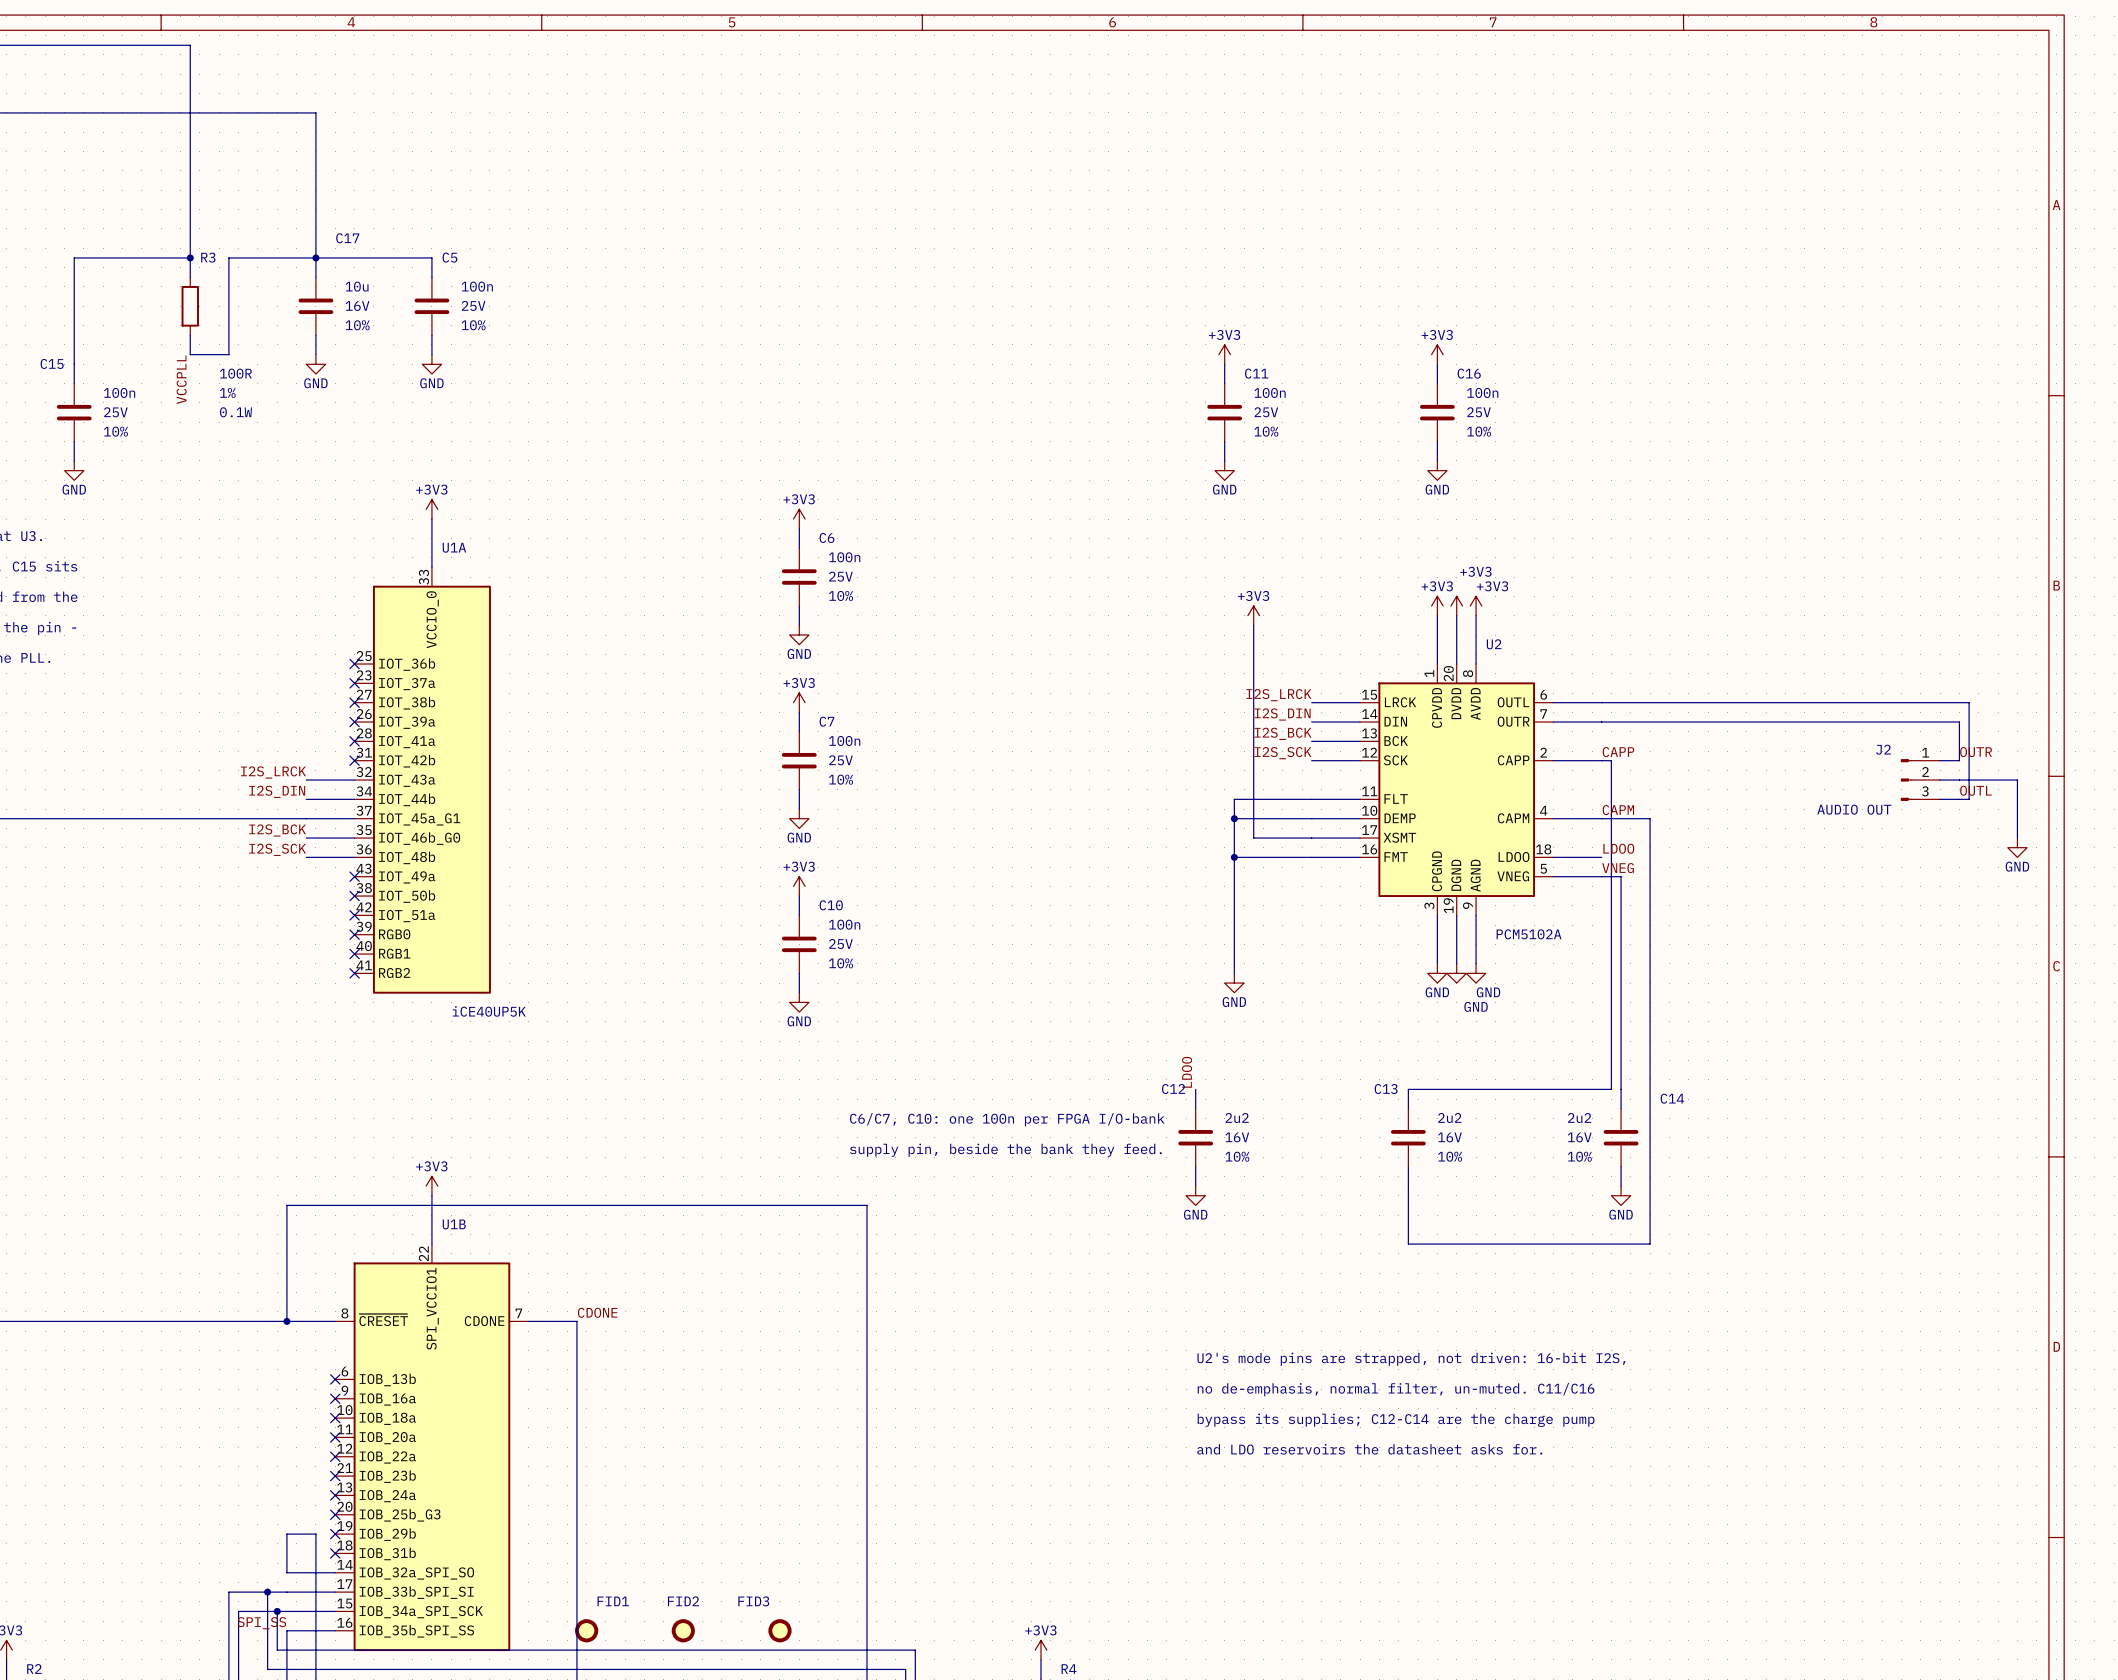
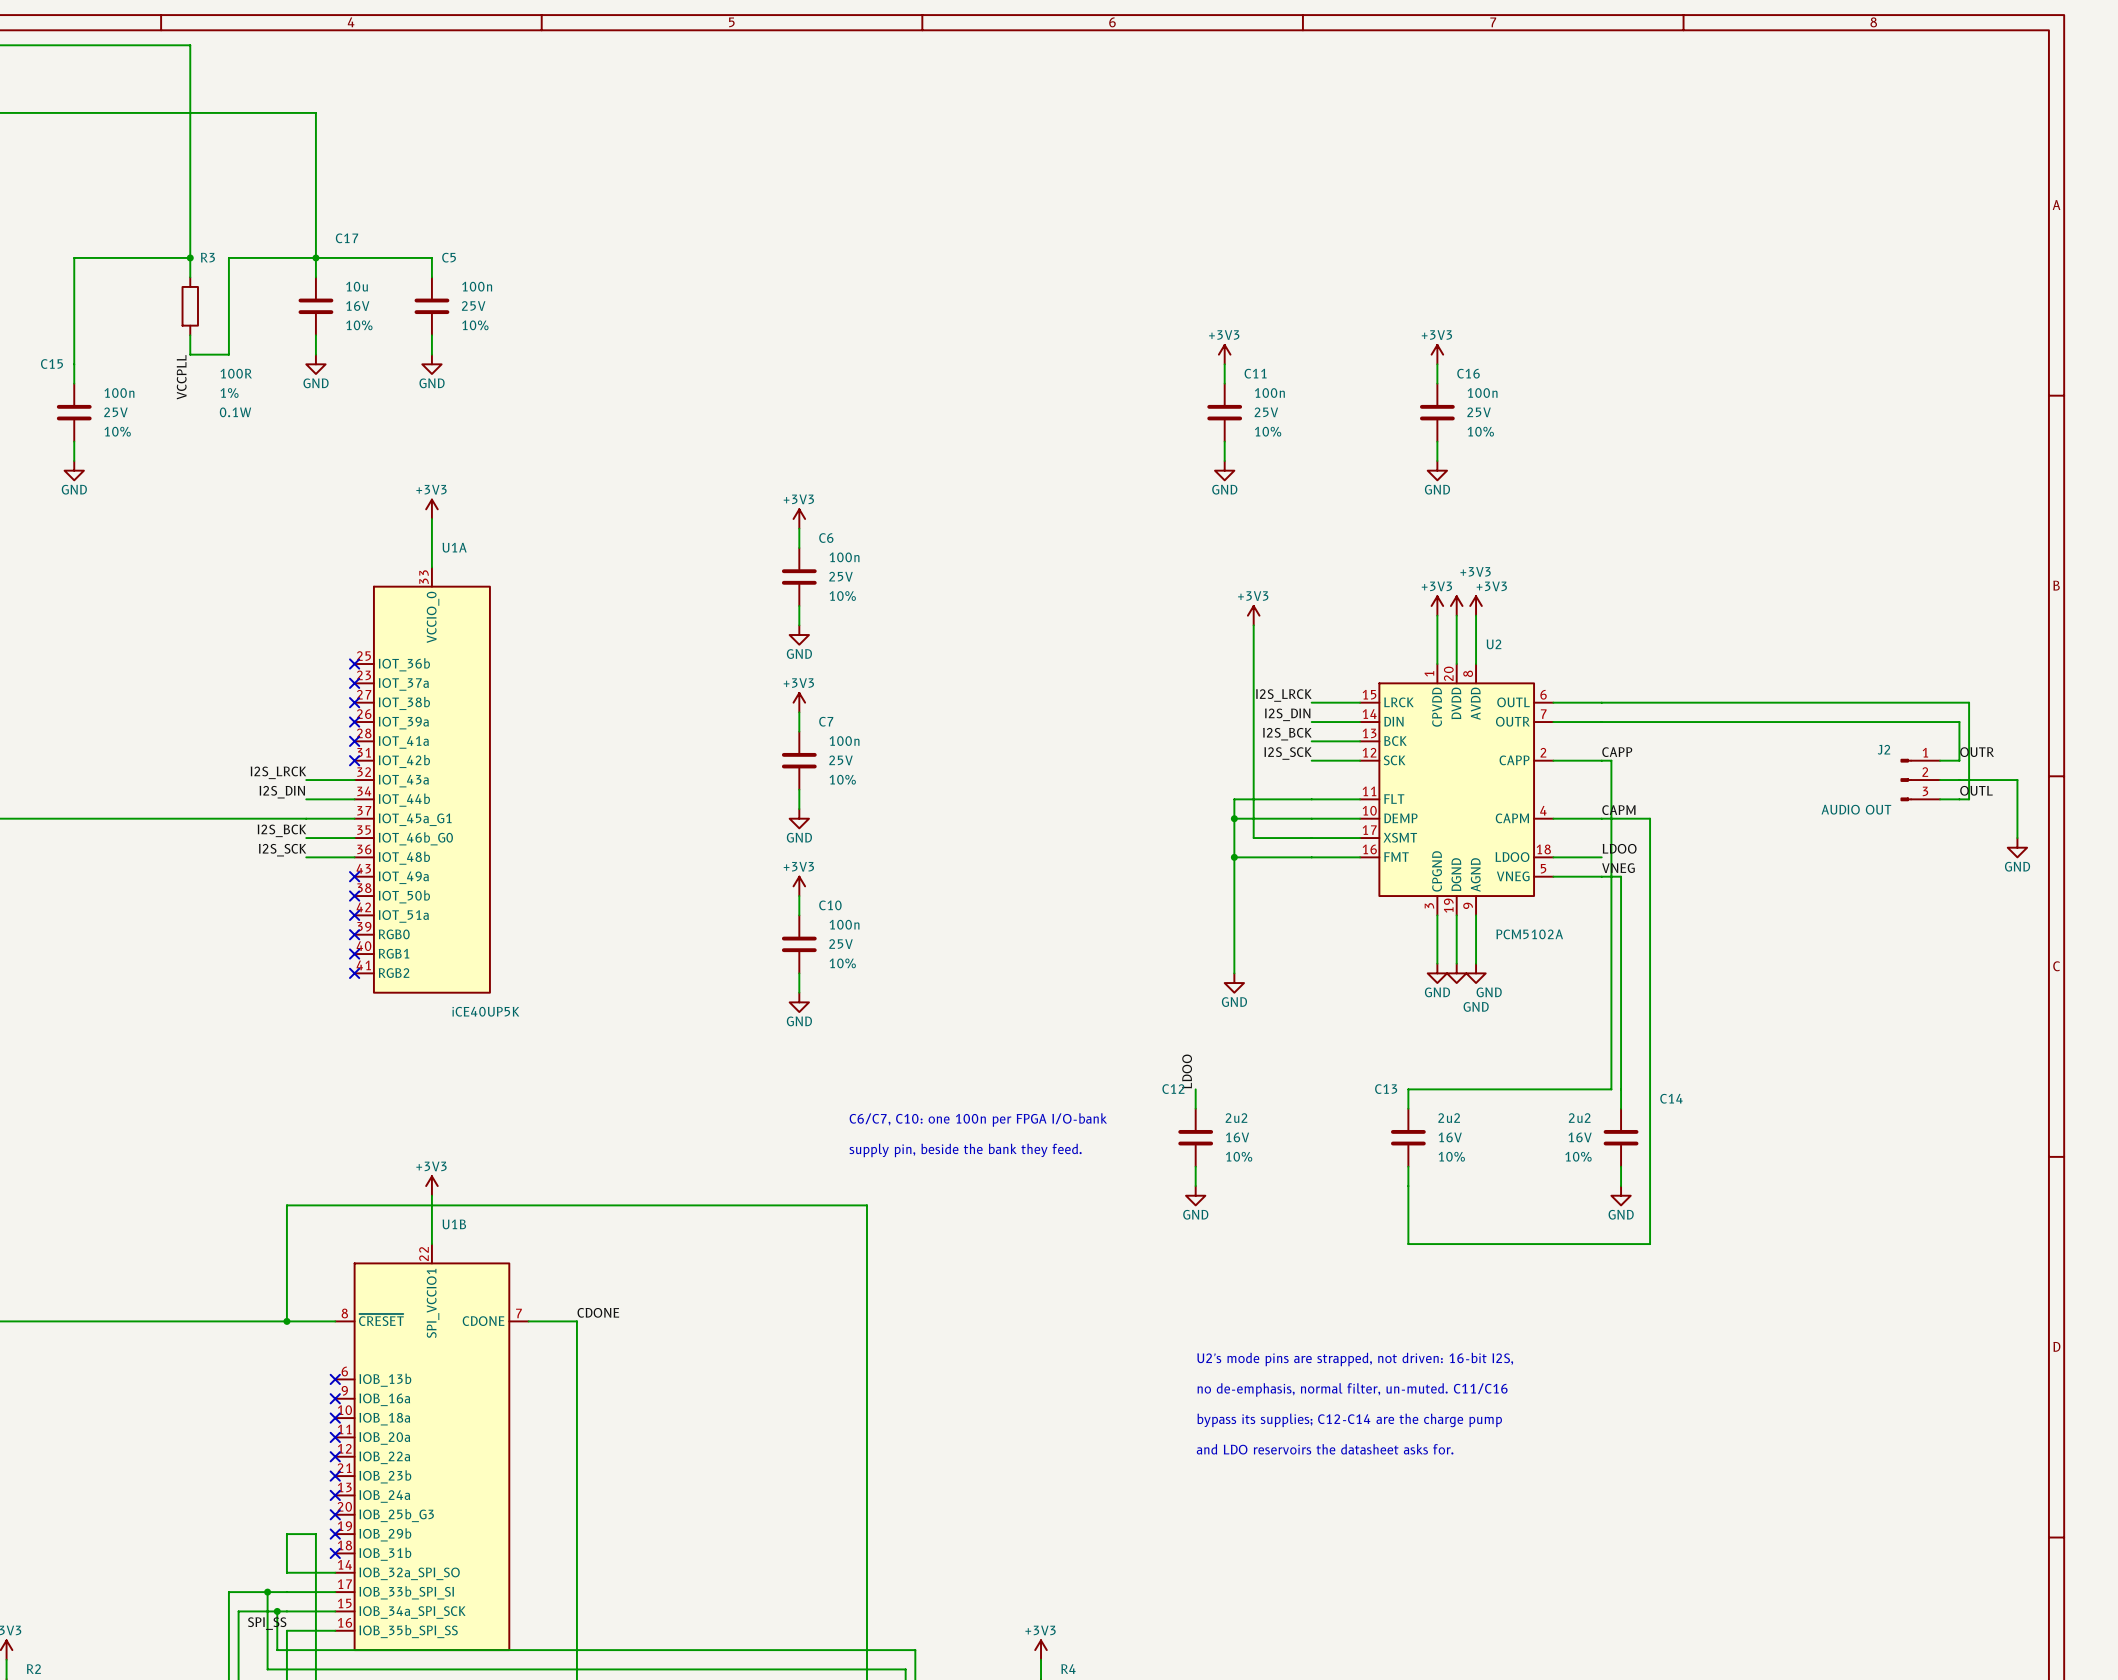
FID1: (586, 1630) -> none
FID2: (683, 1630) -> none
FID3: (779, 1630) -> none

